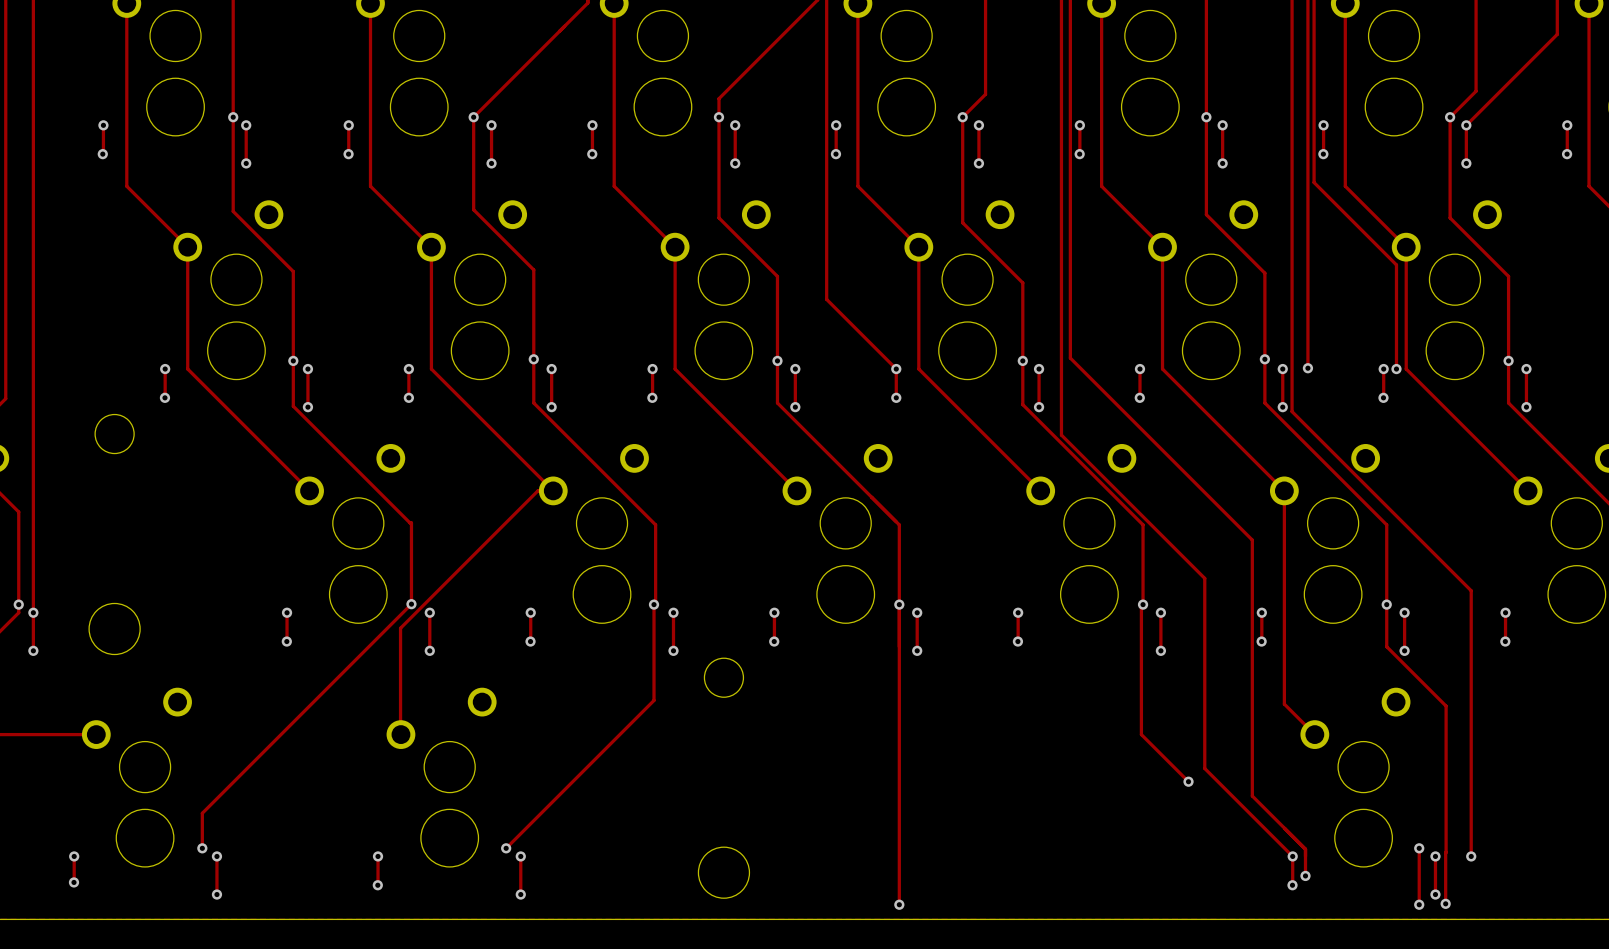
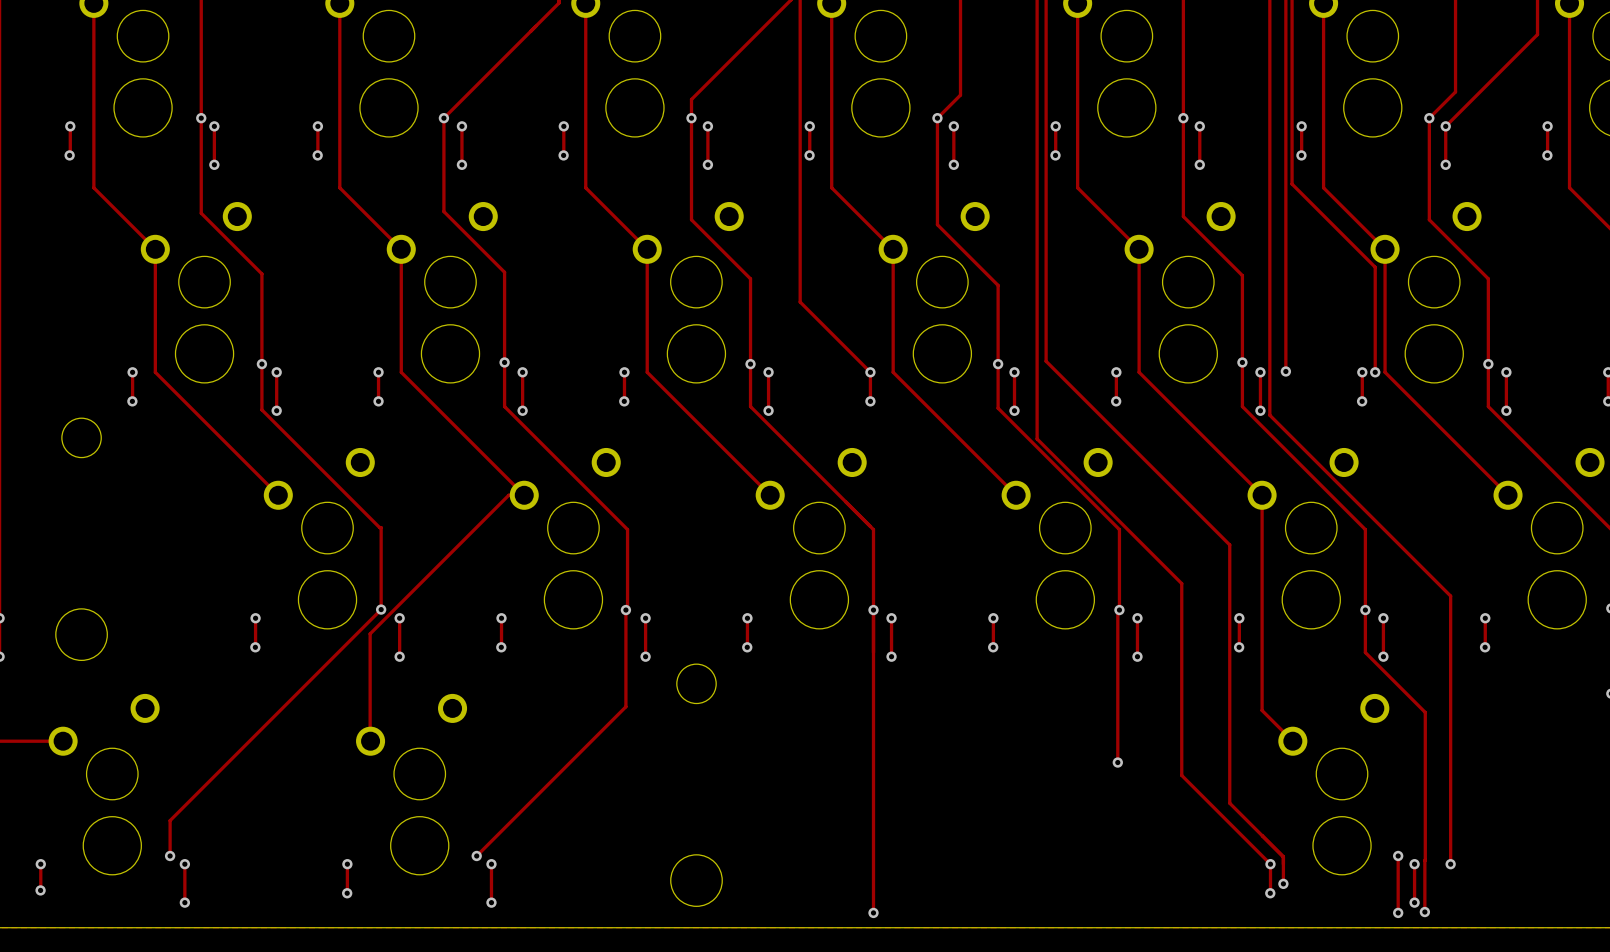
track: (1141, 734) (1188, 781) -> (1117, 741) (1117, 762)
via position: (1188, 781) -> (1117, 762)

